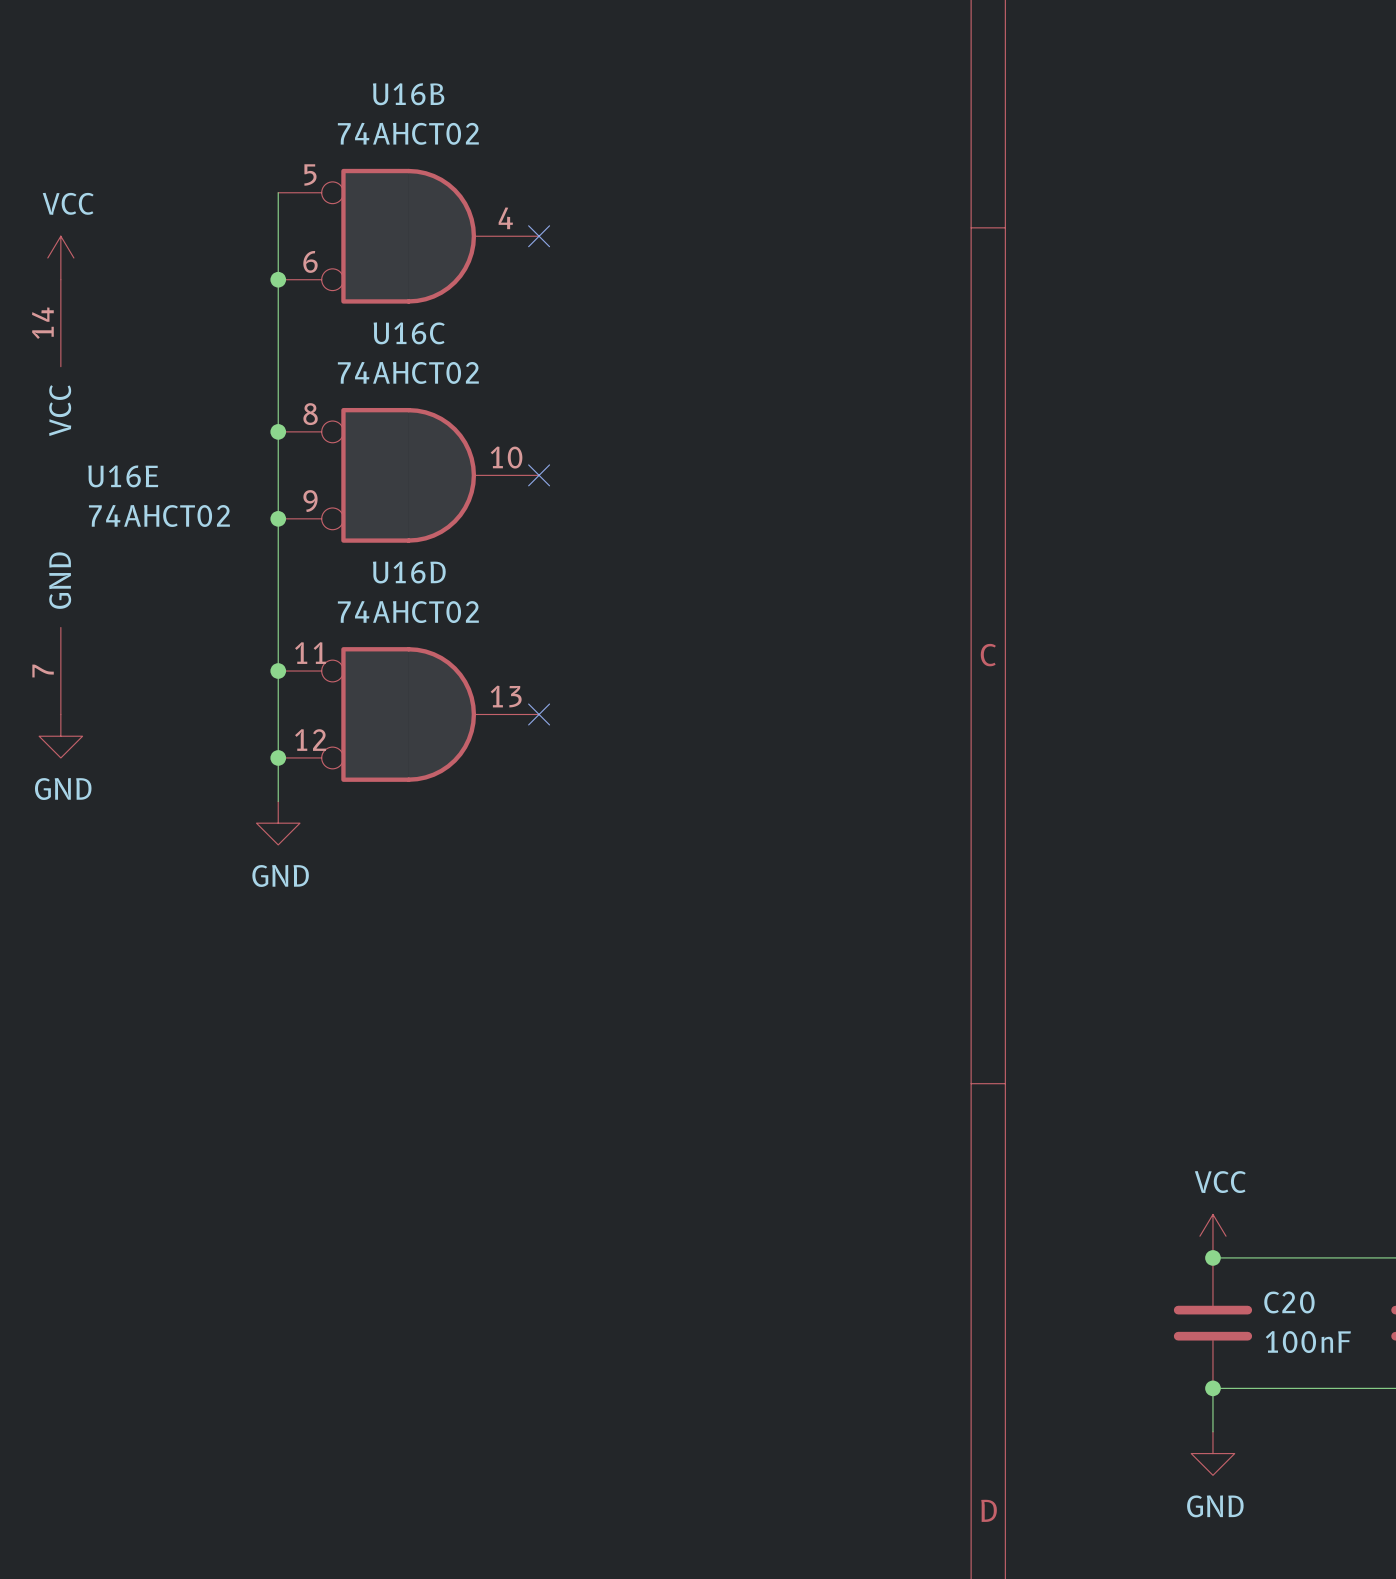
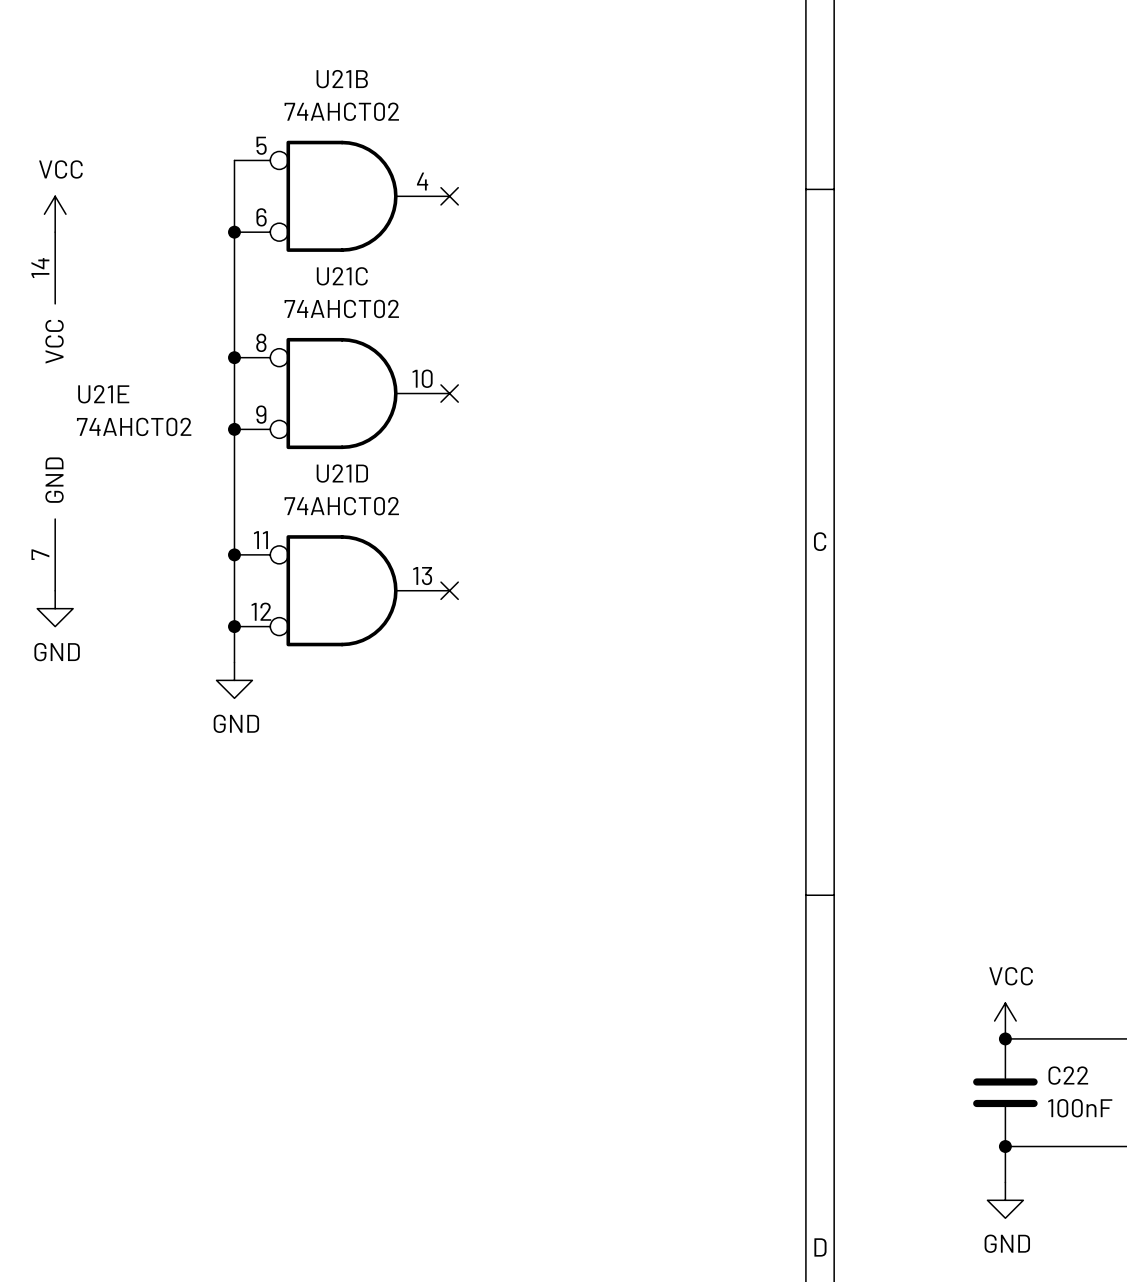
U16B name: U16B (408, 94) -> U21B (342, 79)
U16C name: U16C (409, 333) -> U21C (342, 276)
U16E name: U16E (123, 476) -> U21E (103, 394)
U16D name: U16D (409, 572) -> U21D (342, 473)
C20 name: C20 (1289, 1302) -> C22 (1068, 1075)

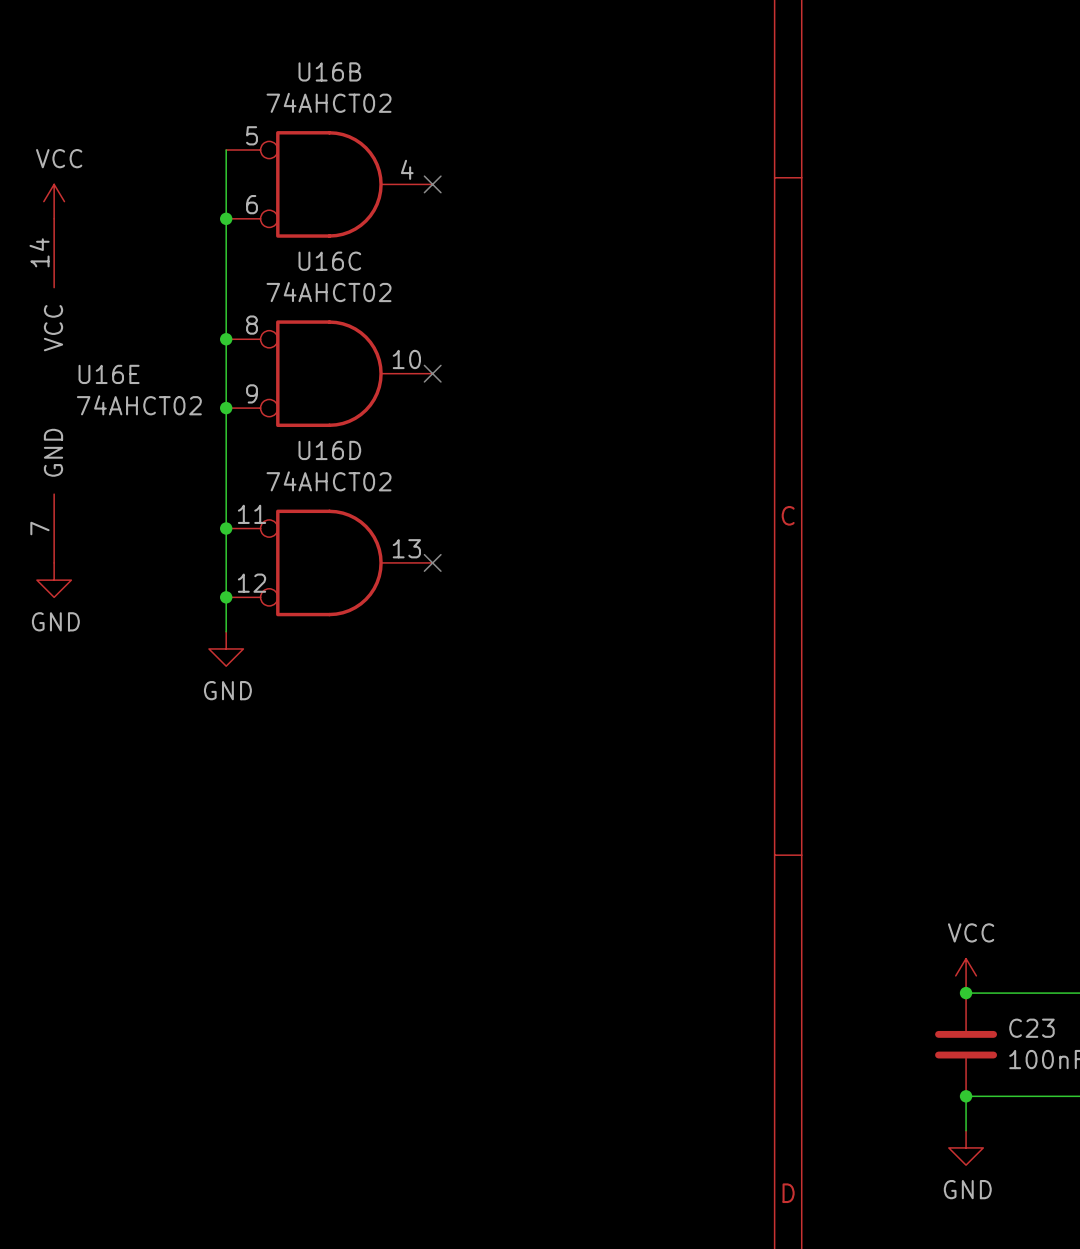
U21B name: U21B (342, 79) -> U16B (329, 71)
U21C name: U21C (342, 276) -> U16C (329, 261)
U21E name: U21E (103, 394) -> U16E (109, 374)
U21D name: U21D (342, 473) -> U16D (329, 450)
C22 name: C22 (1068, 1075) -> C23 (1031, 1028)

